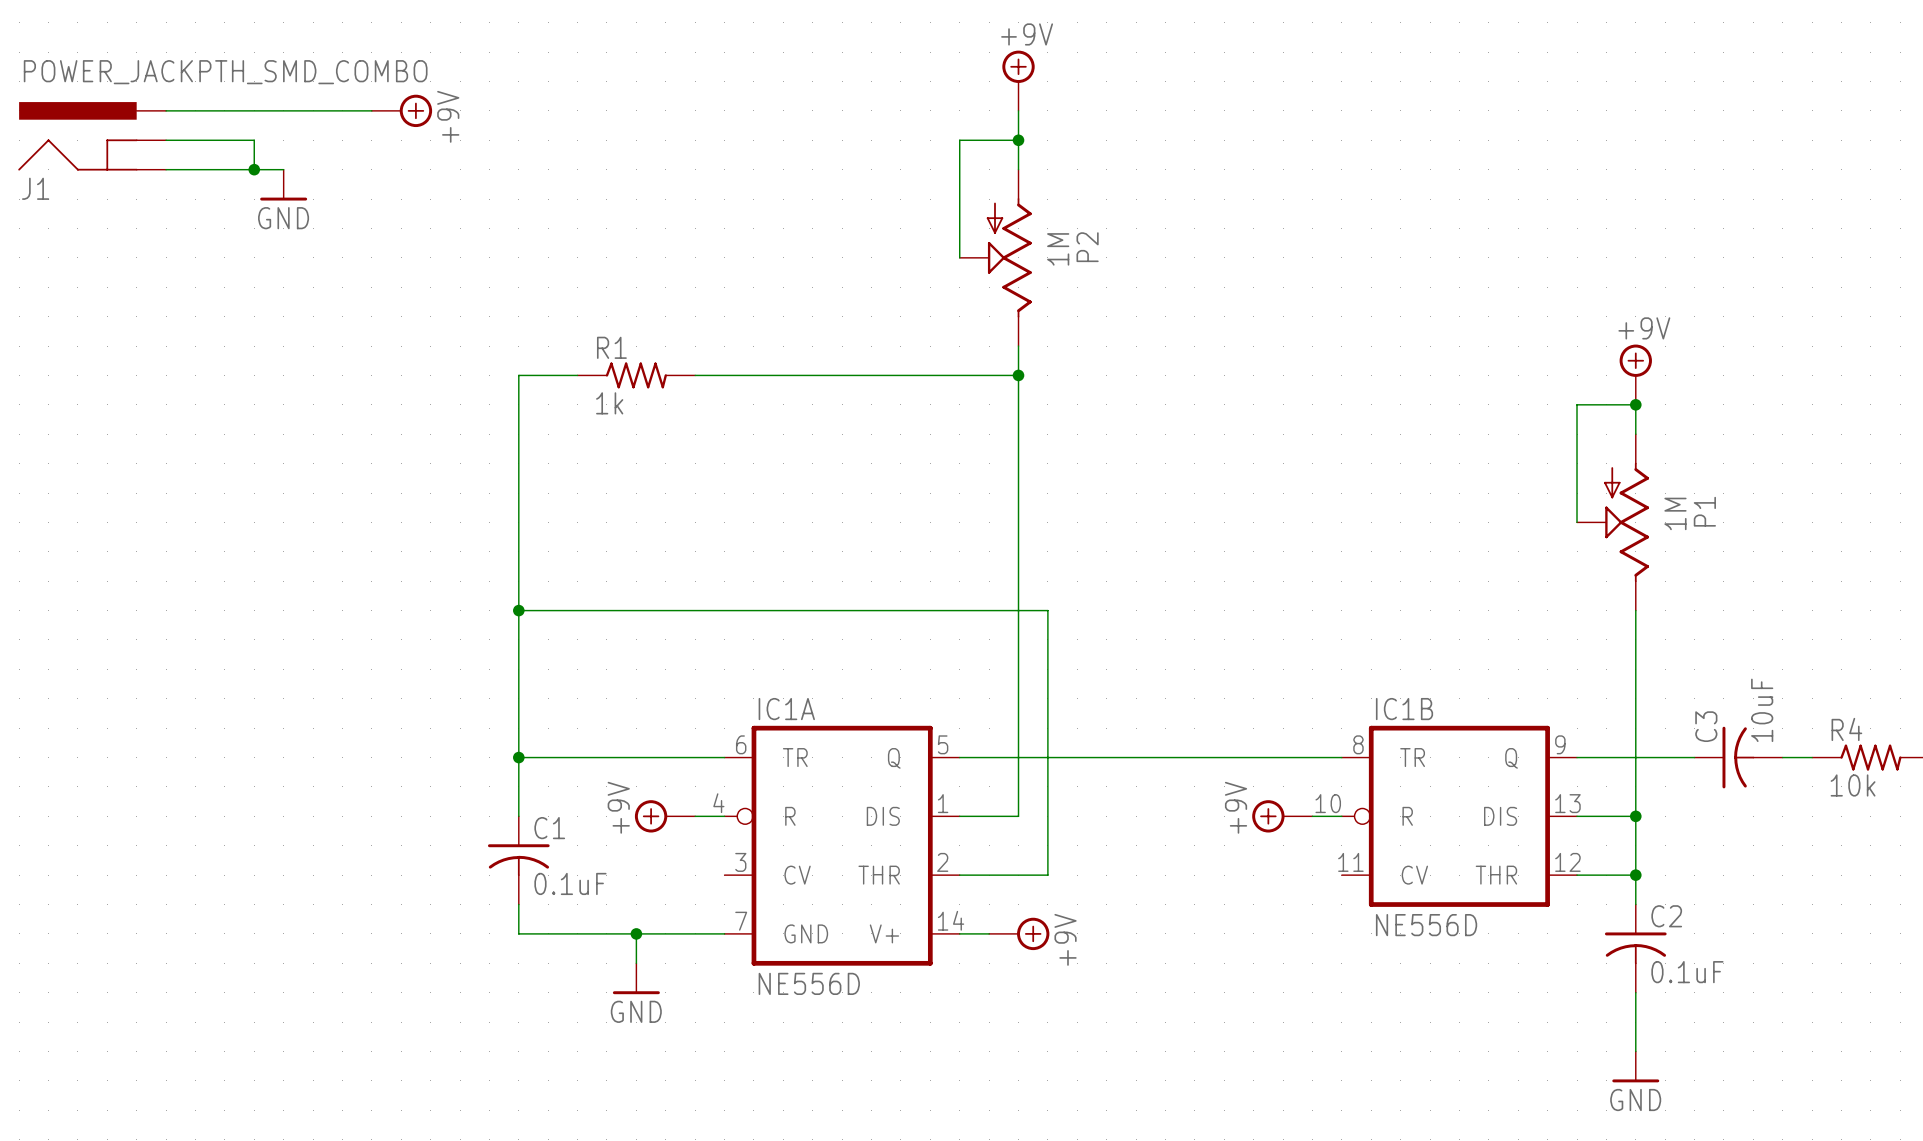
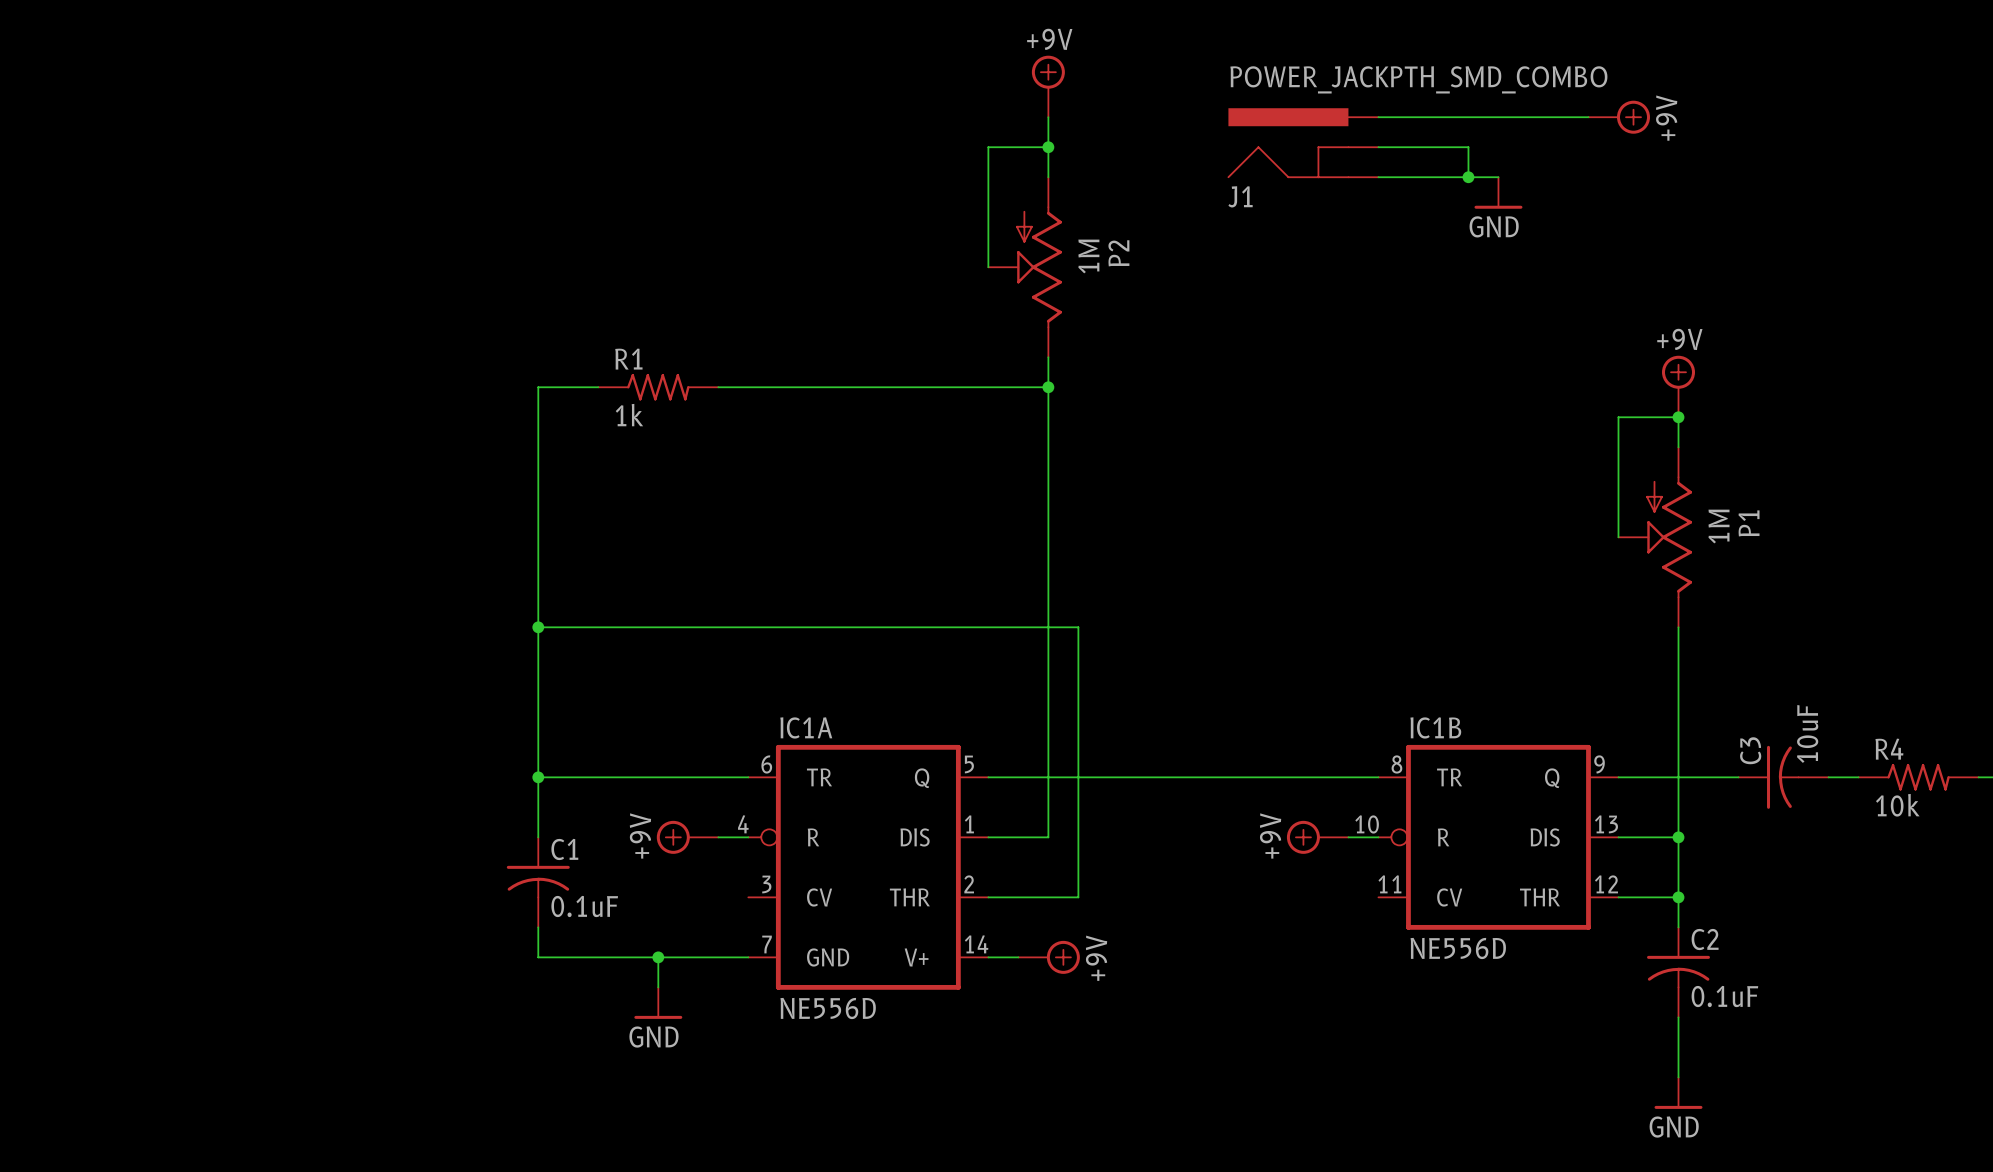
wire: (166, 110) (371, 110) -> none
power symbol: +9V (401, 110) -> none
wire: none -> (1378, 117) (1588, 117)
power symbol: none -> +9V (1619, 117)
J1 position: (92, 136) -> (1302, 143)
wire: (166, 140) (254, 140) (254, 169) -> none
wire: none -> (1378, 147) (1468, 147) (1468, 177)
wire: (166, 169) (283, 169) -> none
junction: (254, 169) -> none
wire: none -> (1378, 177) (1498, 177)
junction: none -> (1468, 177)
power symbol: GND (283, 185) -> none
power symbol: none -> GND (1498, 192)

